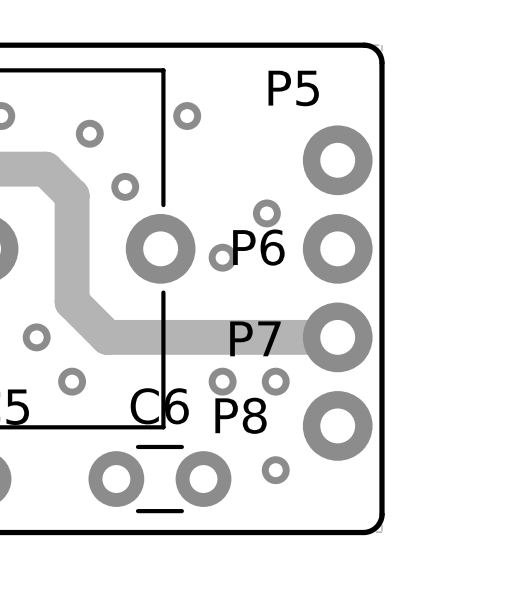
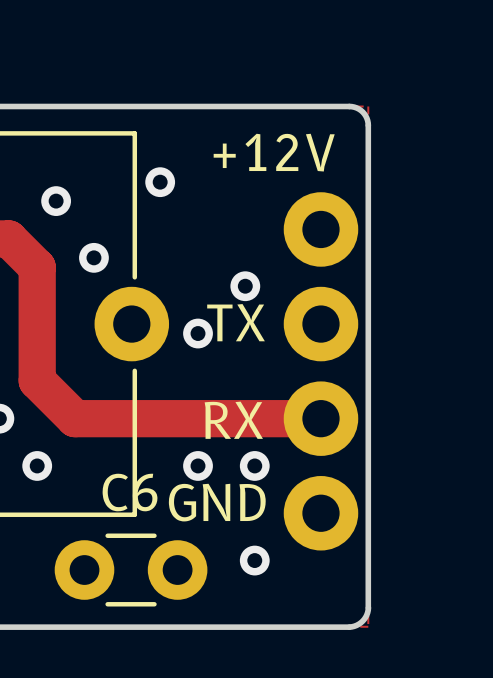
P5 name: P5 (293, 88) -> +12V (274, 152)
P6 name: P6 (258, 247) -> TX (236, 322)
P7 name: P7 (255, 338) -> RX (233, 420)
P8 name: P8 (241, 415) -> GND (217, 502)

